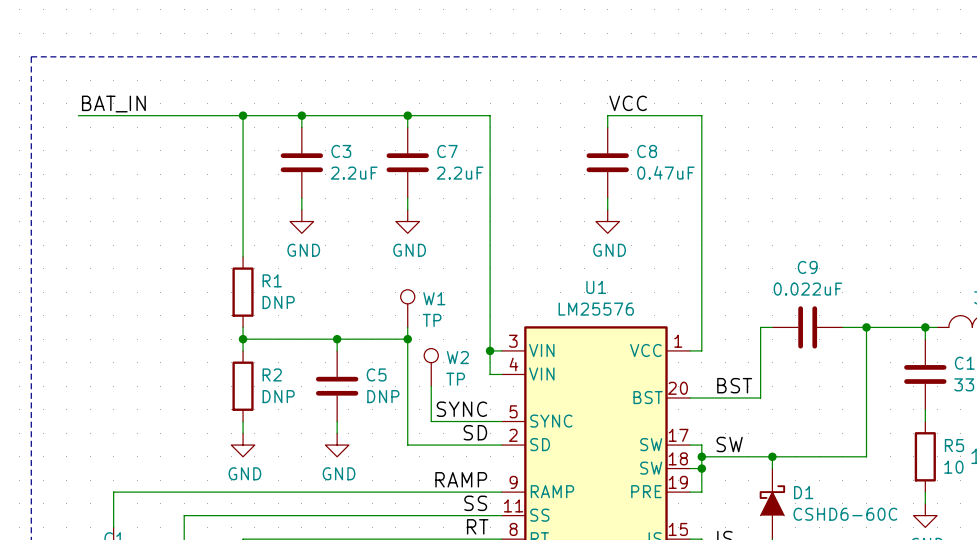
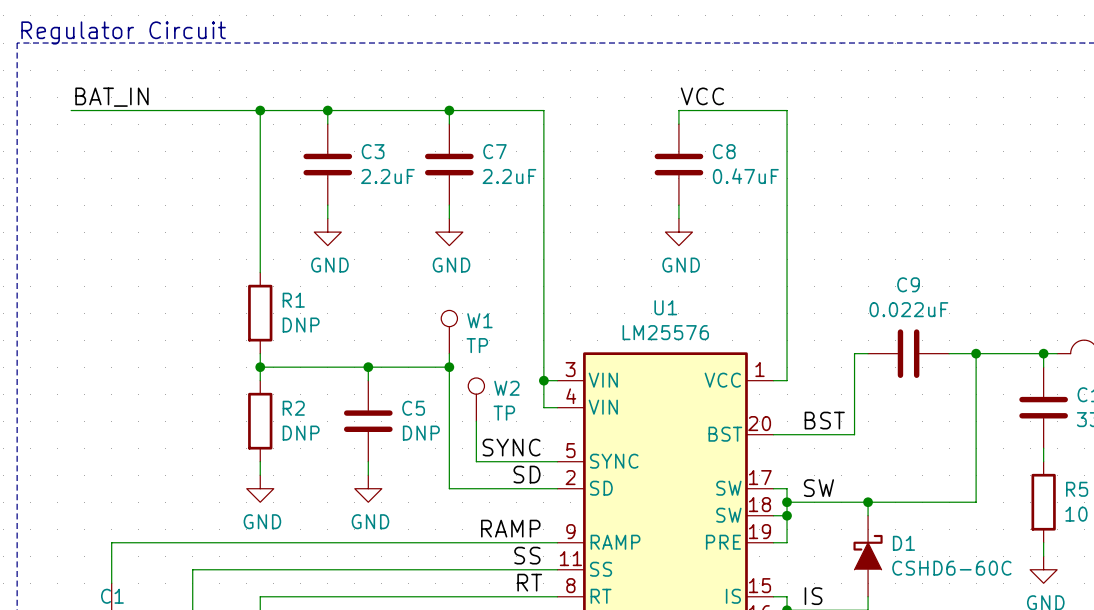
text: none -> Regulator Circuit (123, 32)

